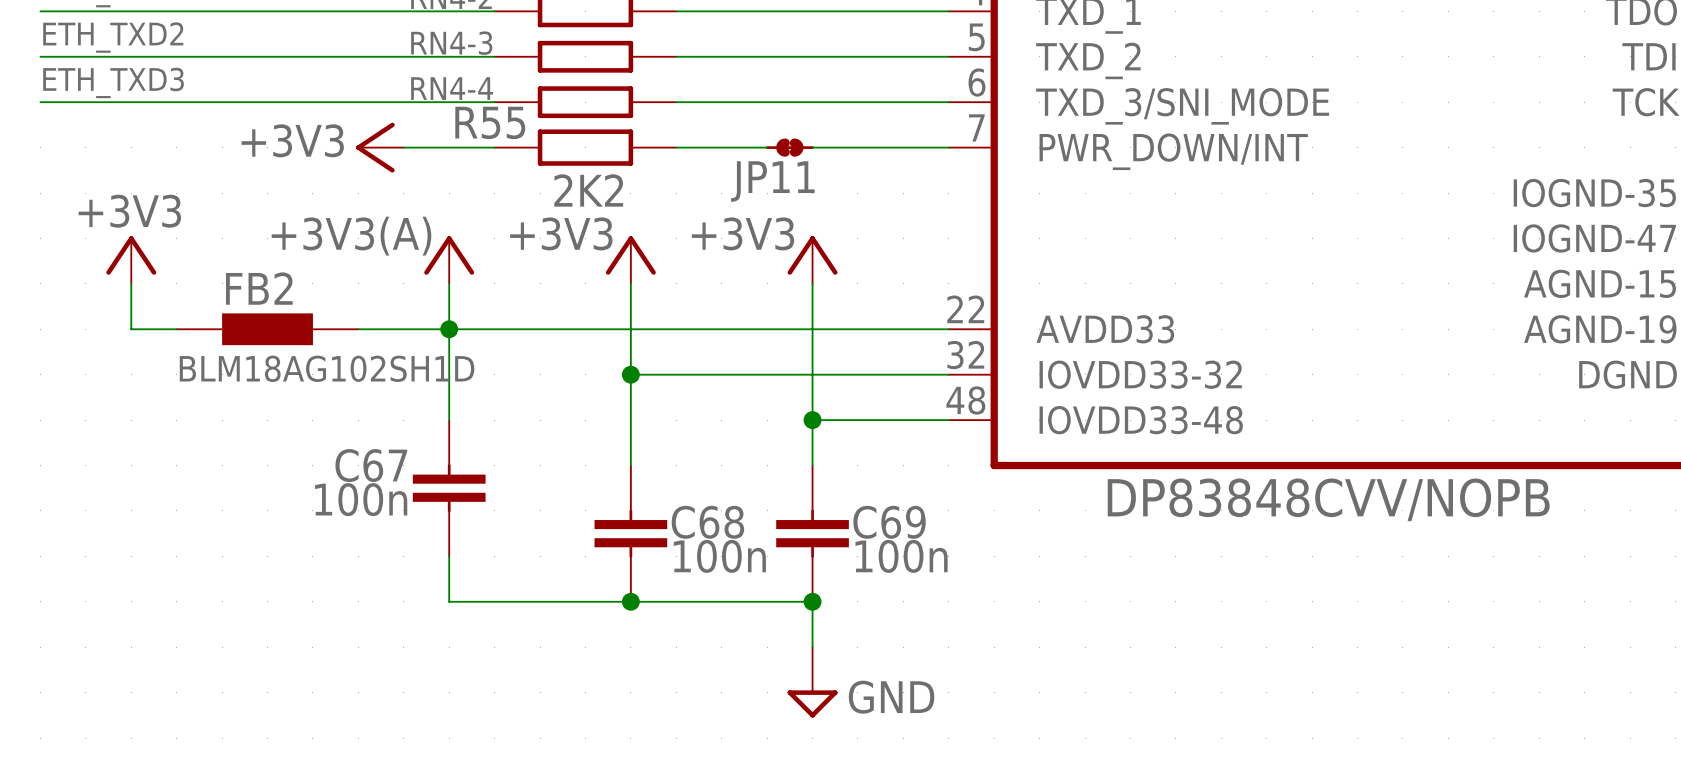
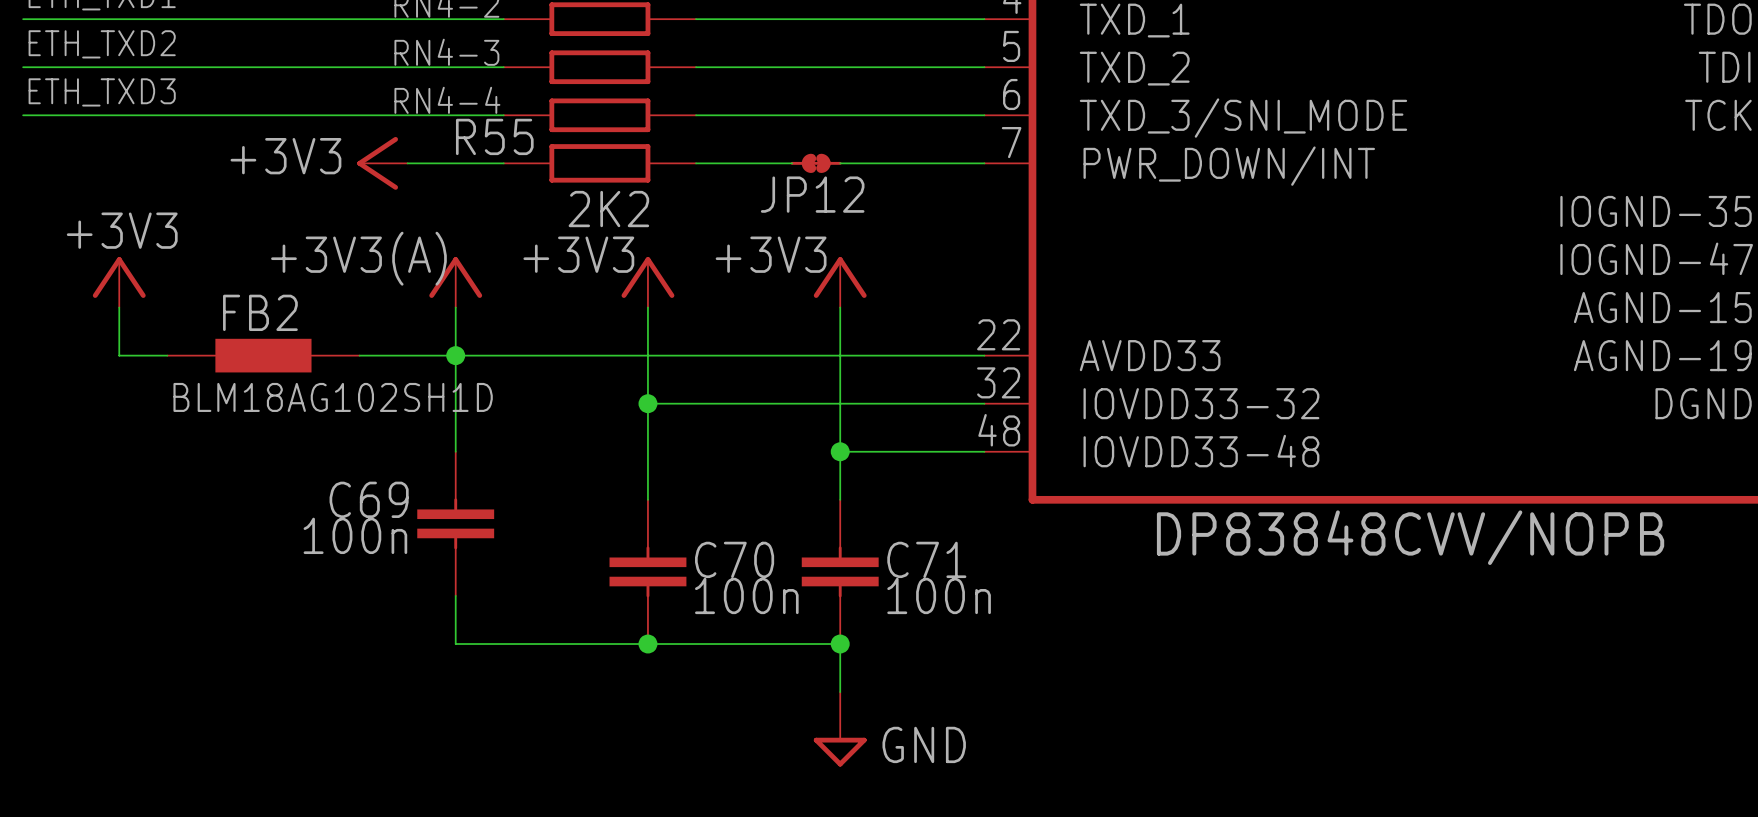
JP11 name: JP11 (772, 181) -> JP12 (812, 194)
C67 name: C67 (371, 465) -> C69 (369, 499)
C68 name: C68 (707, 522) -> C70 (734, 559)
C69 name: C69 (889, 522) -> C71 (926, 559)

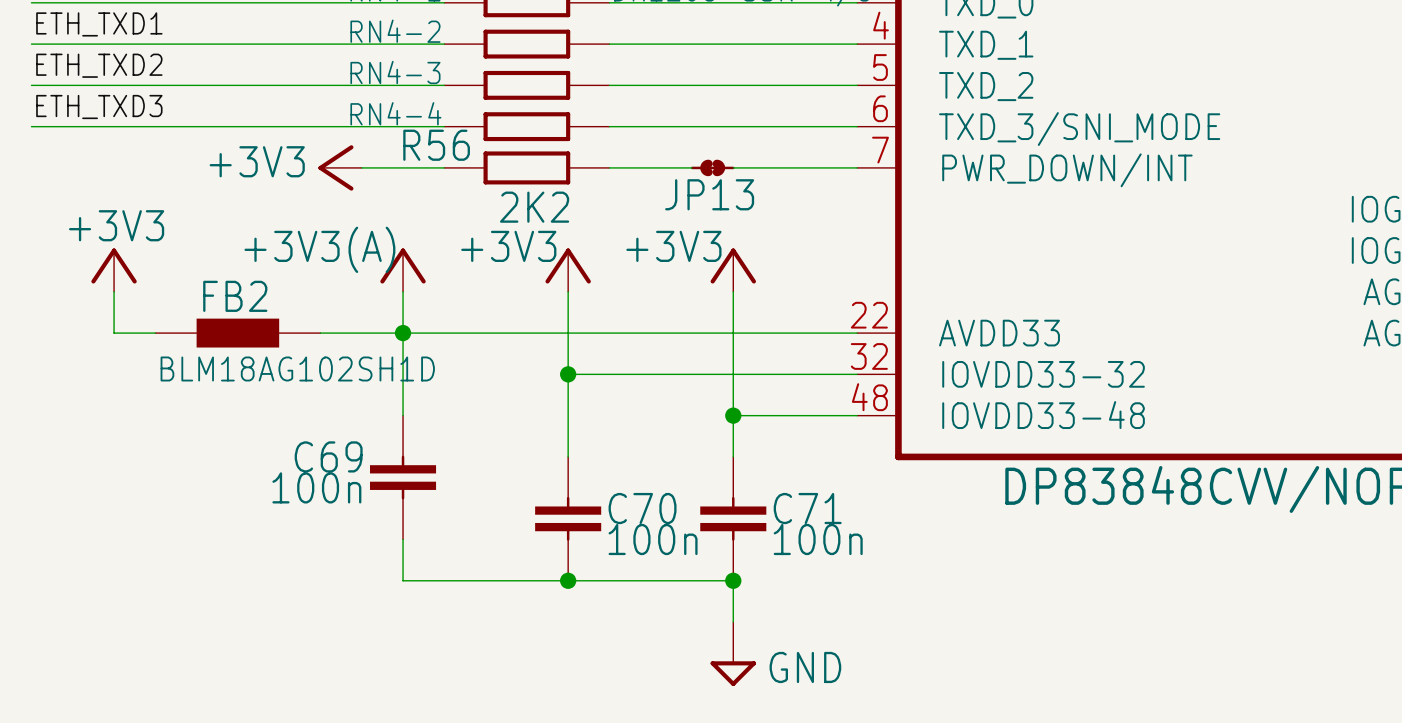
R55 name: R55 (494, 136) -> R56 (436, 145)
JP12 name: JP12 (812, 194) -> JP13 (709, 194)

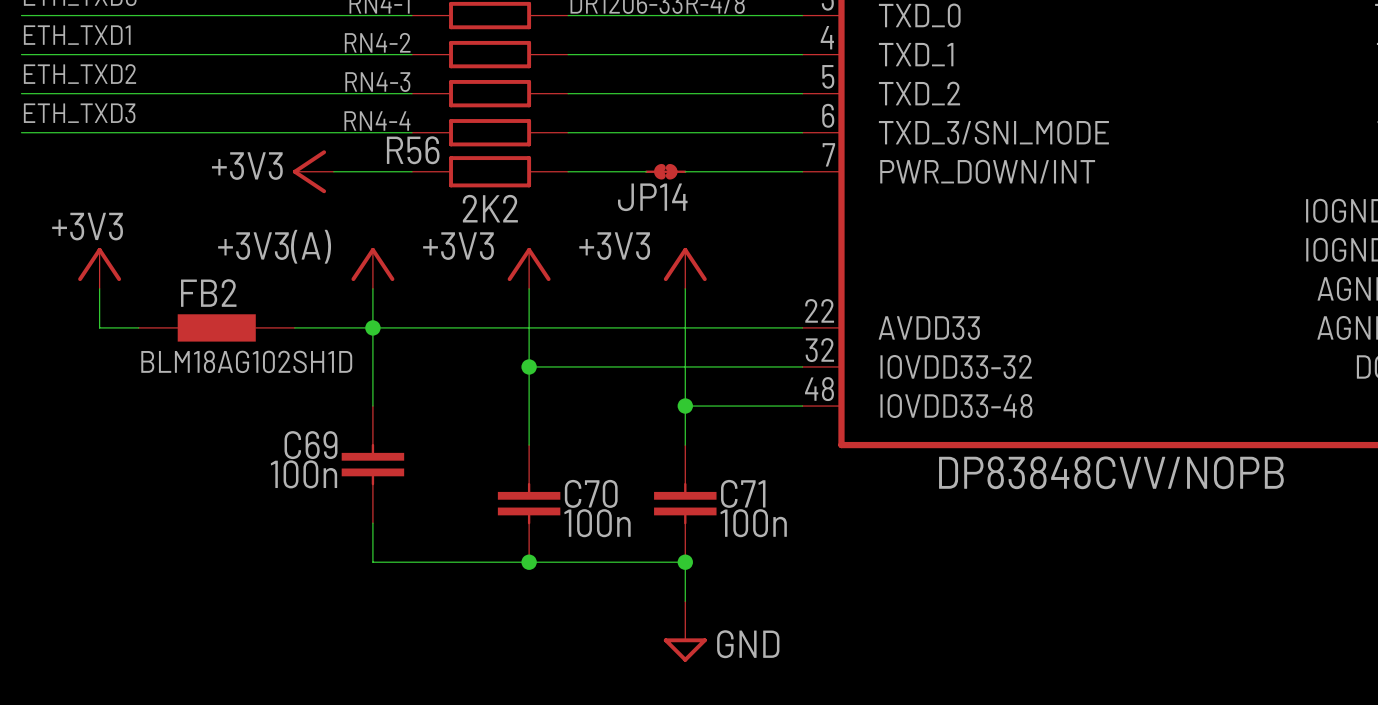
JP13 name: JP13 (709, 194) -> JP14 (652, 197)

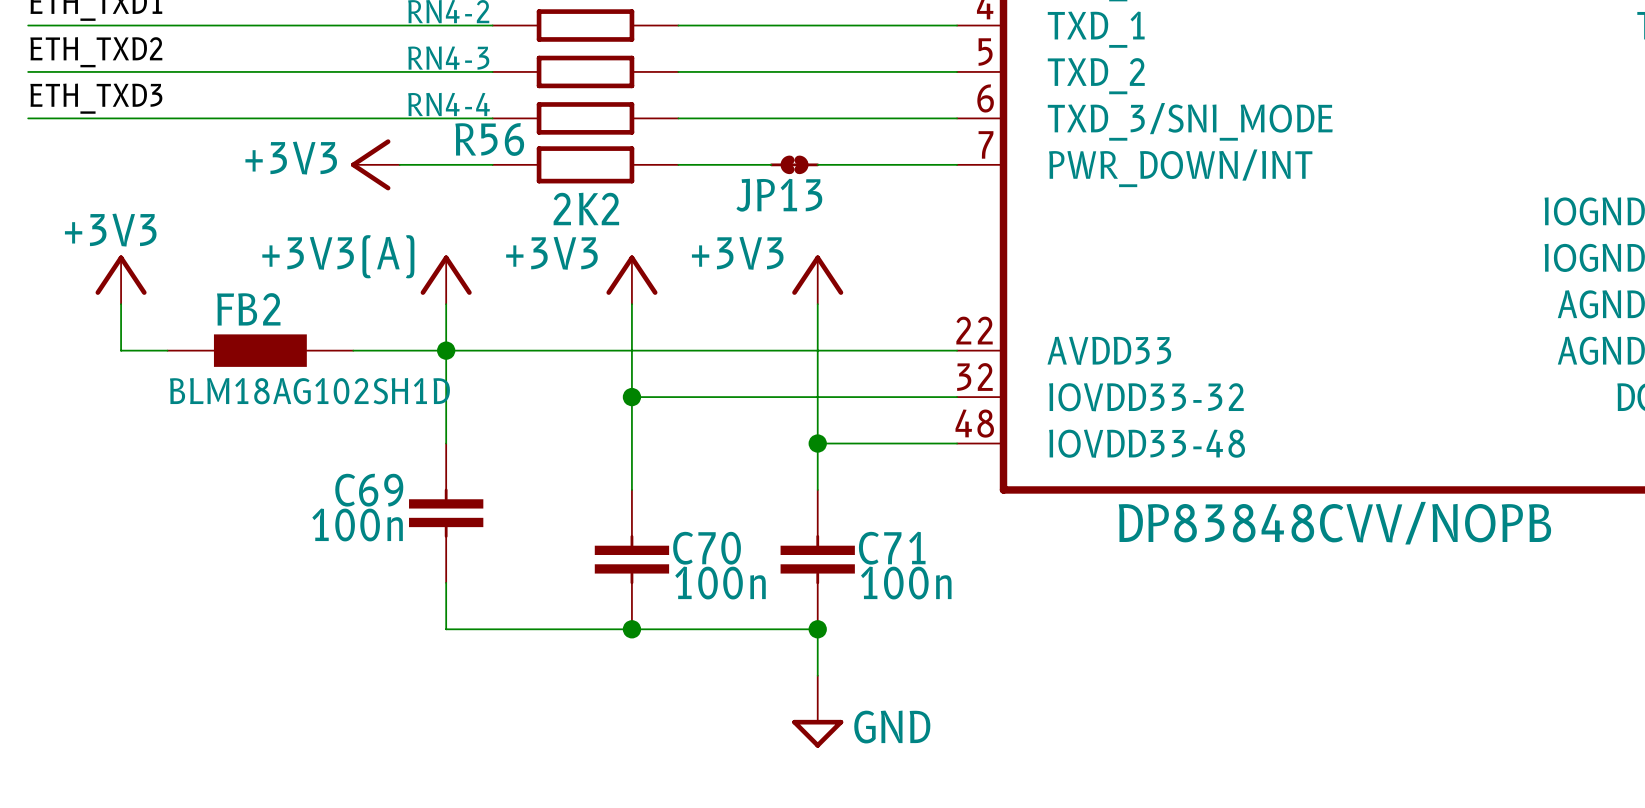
JP14 name: JP14 (652, 197) -> JP13 (779, 195)

